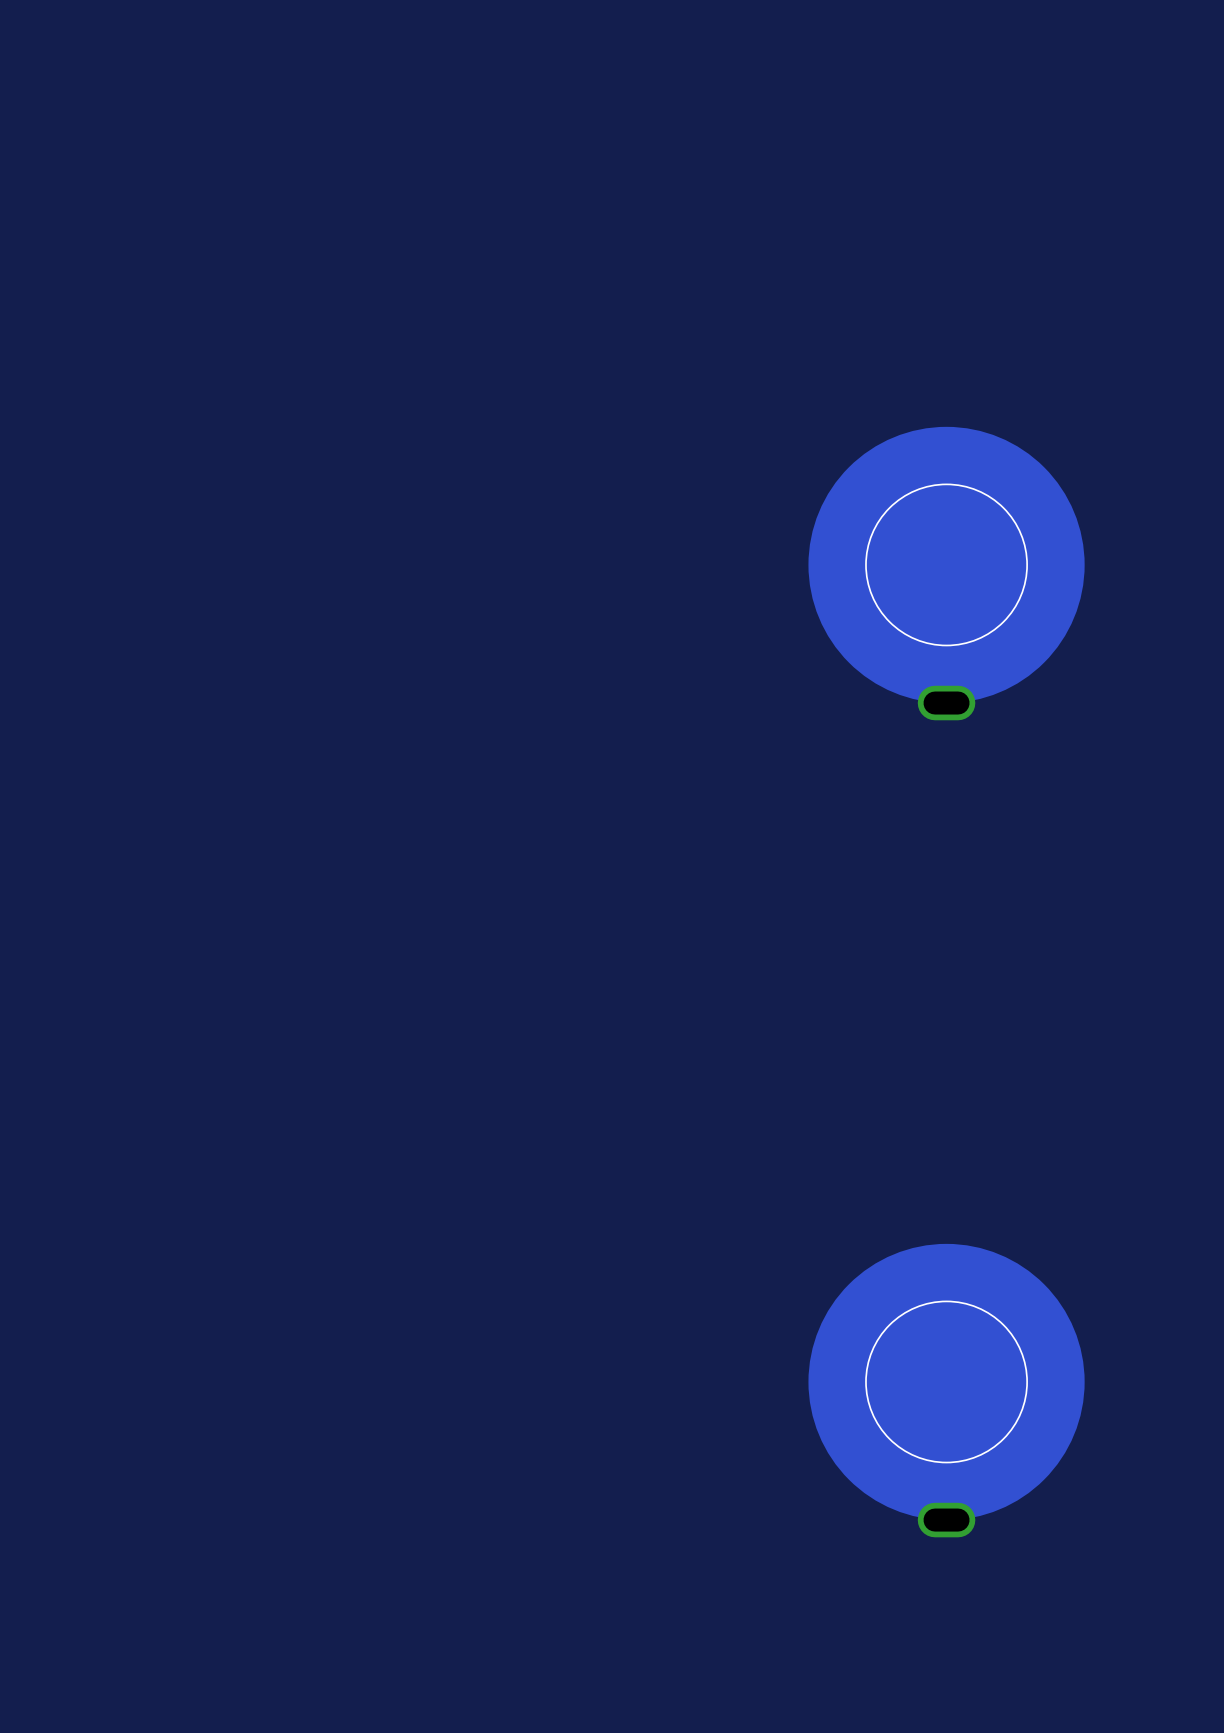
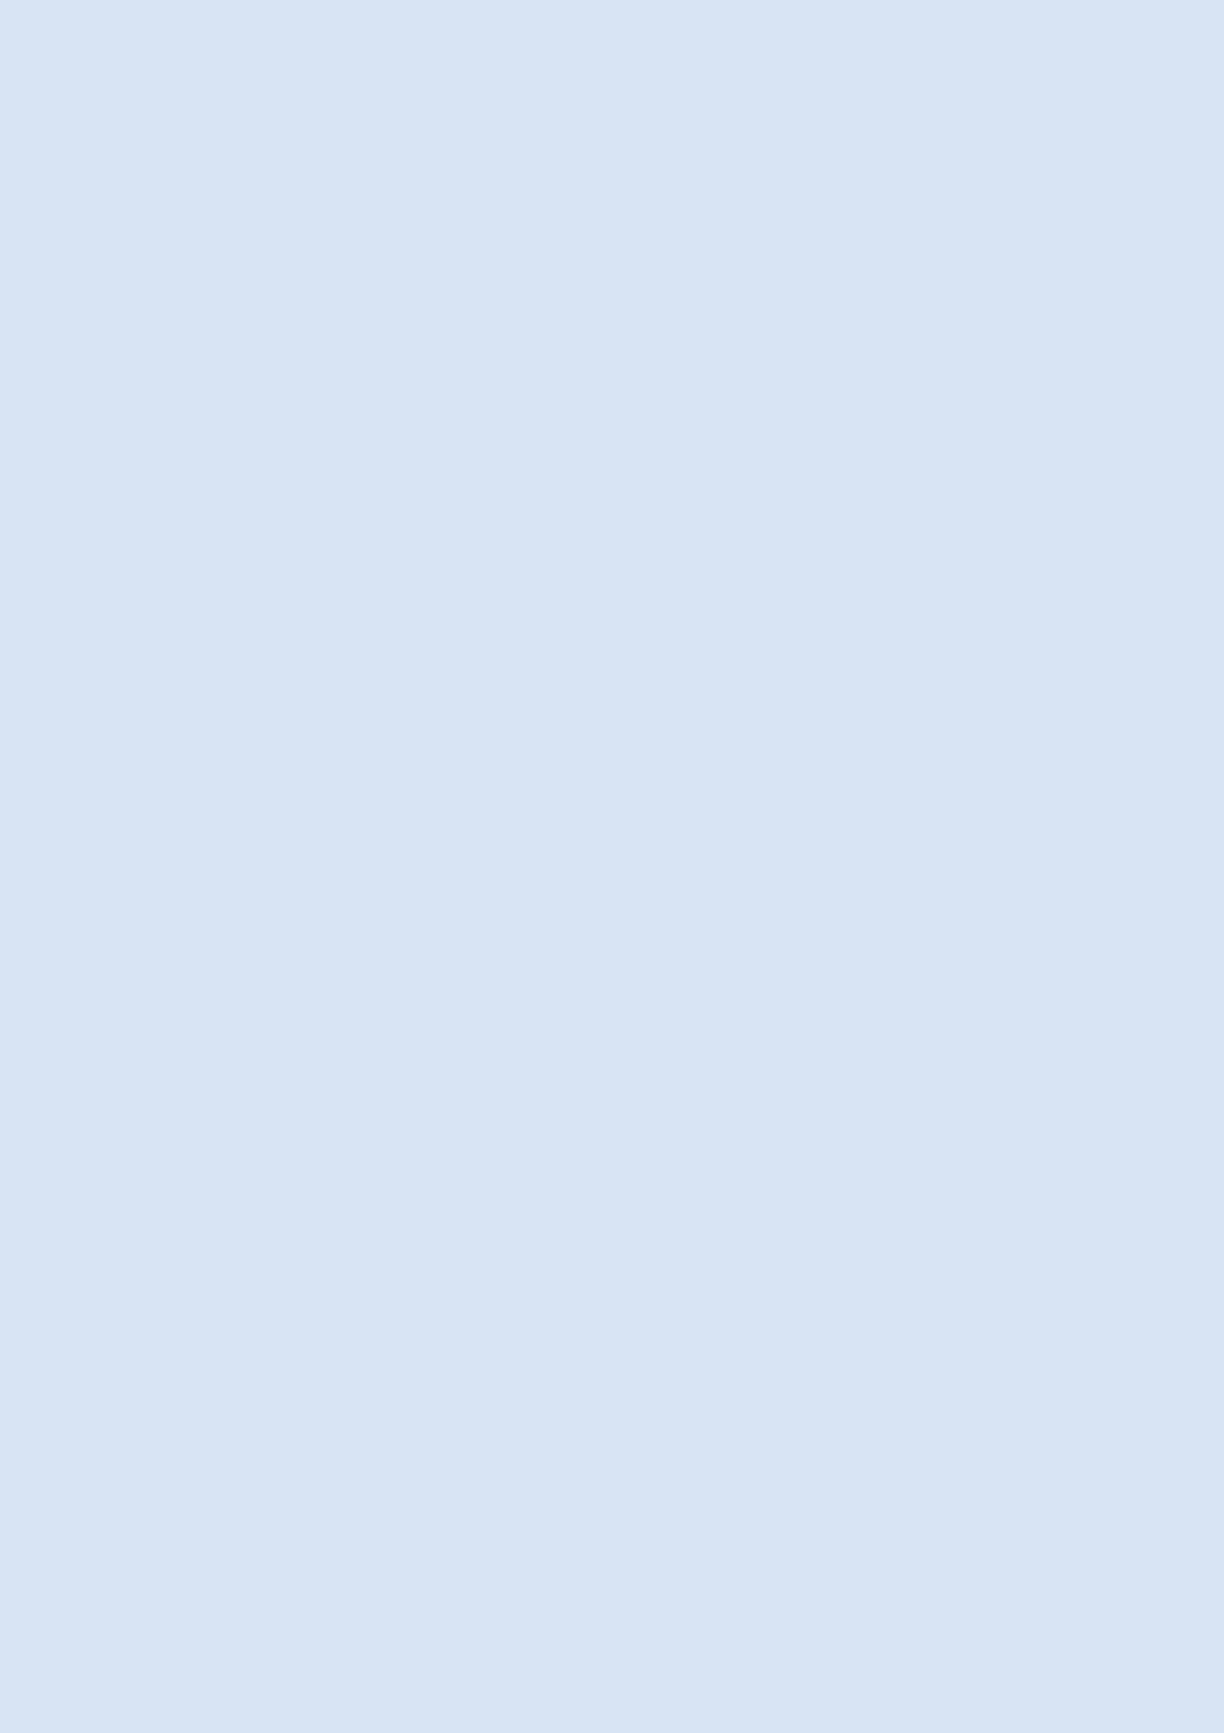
part: (946, 573) -> none
part: (946, 1390) -> none

